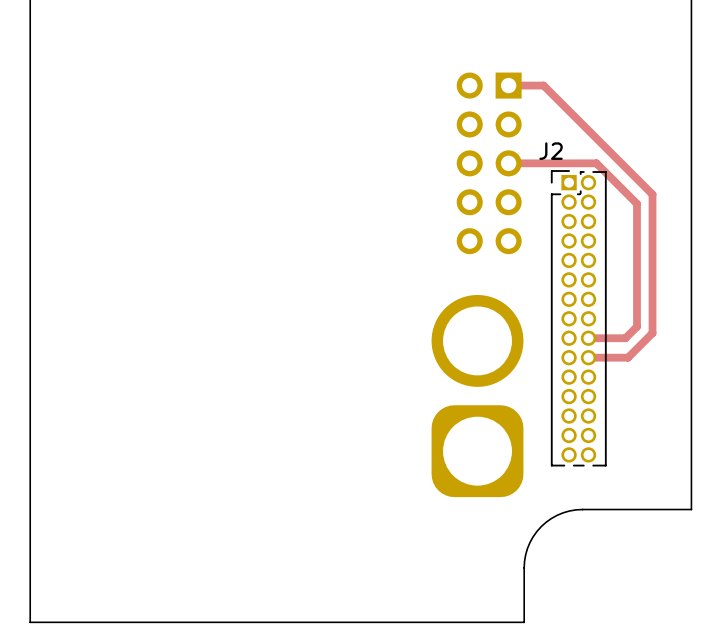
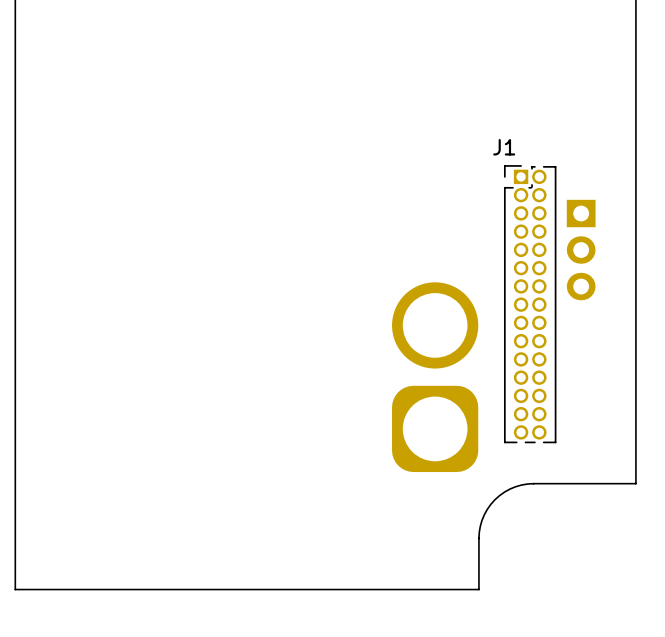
track: (508, 85) (543, 85) (652, 194) (652, 333) (628, 357) (588, 357) -> none
J2 name: J2 (551, 151) -> J1 (504, 147)
part: (489, 163) -> none
track: (508, 163) (596, 163) (636, 203) (636, 326) (625, 338) (588, 338) -> none
part: none -> (581, 250)

